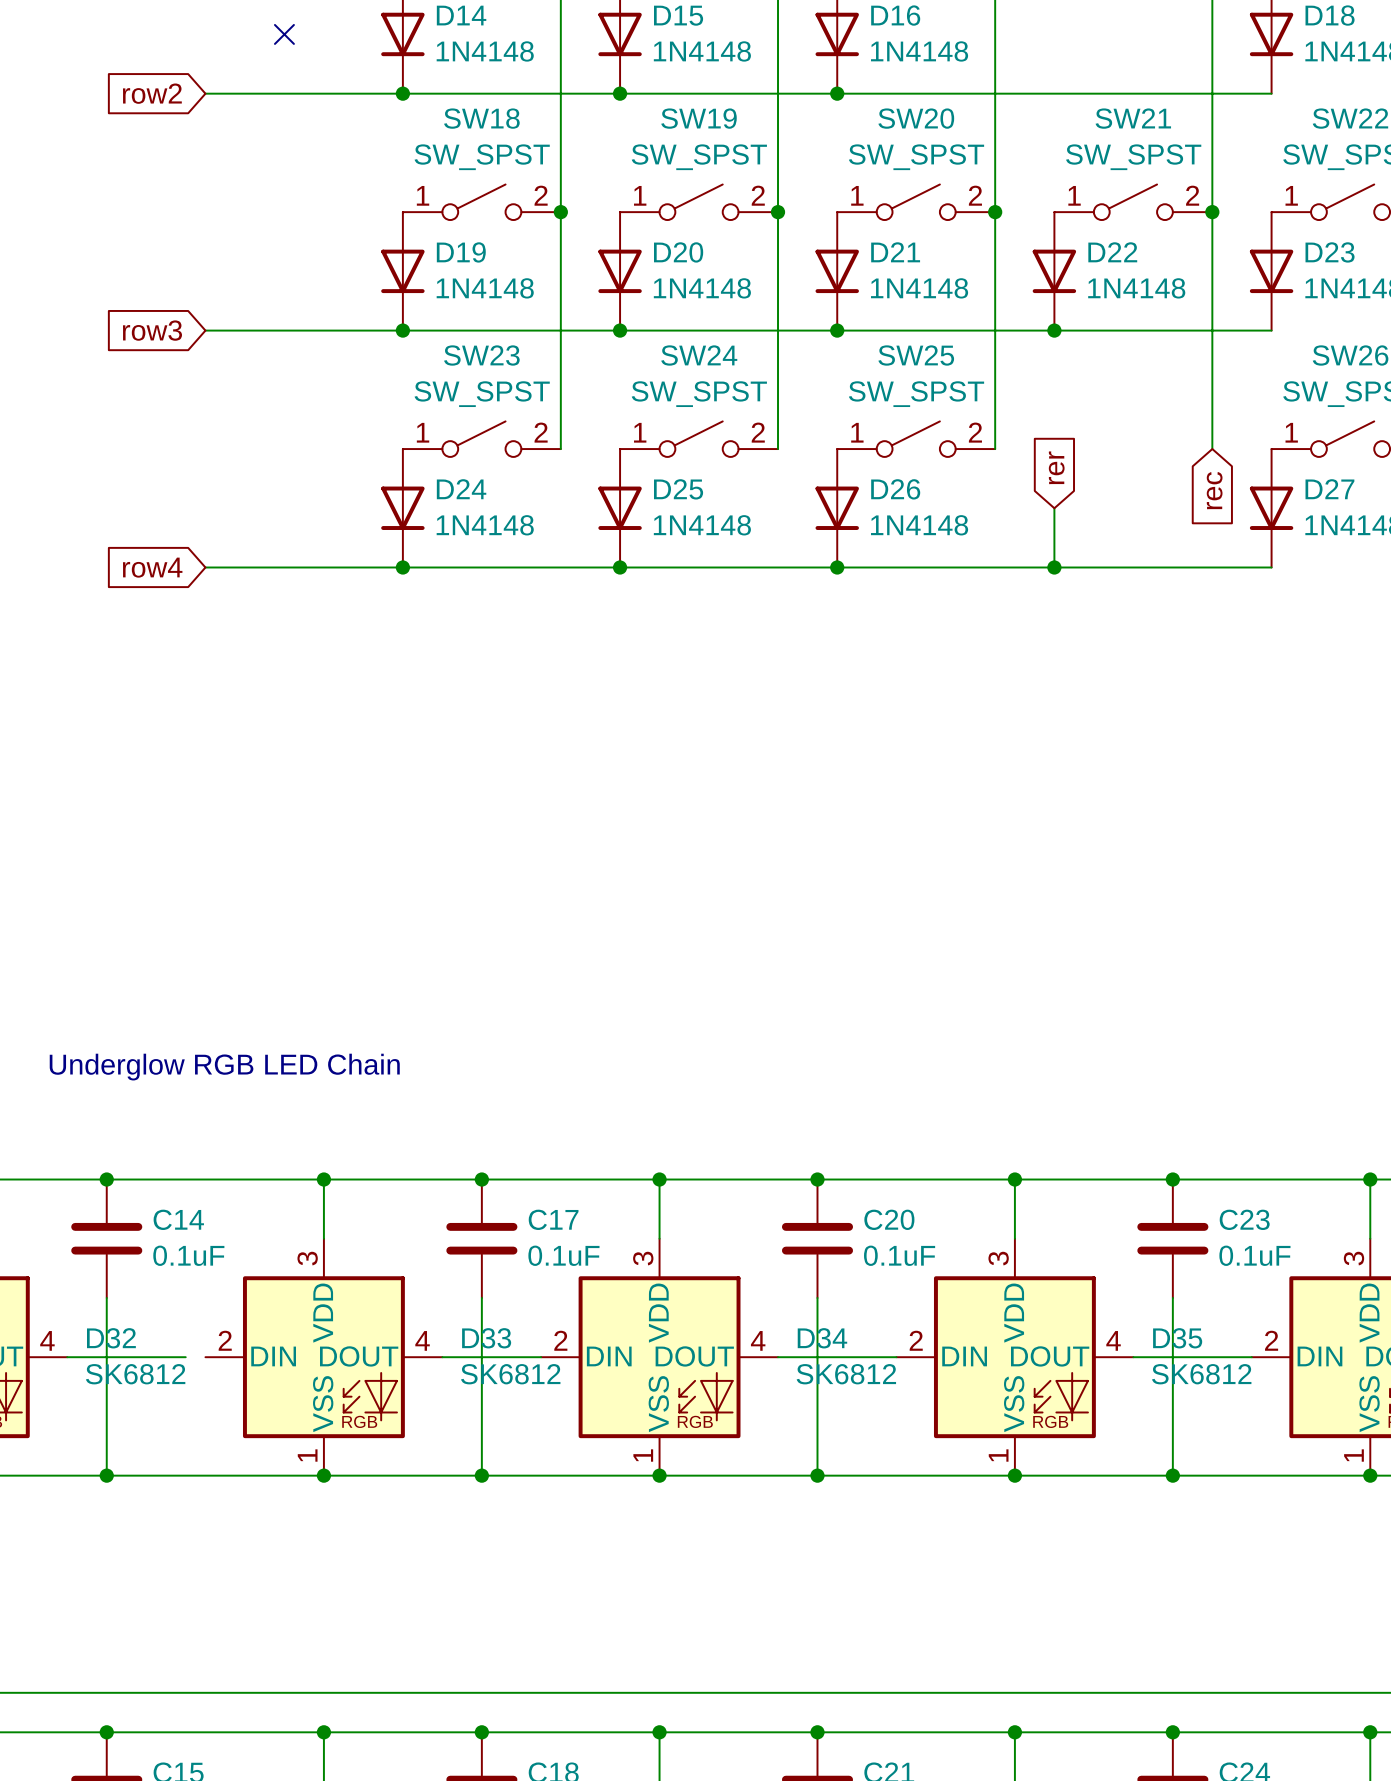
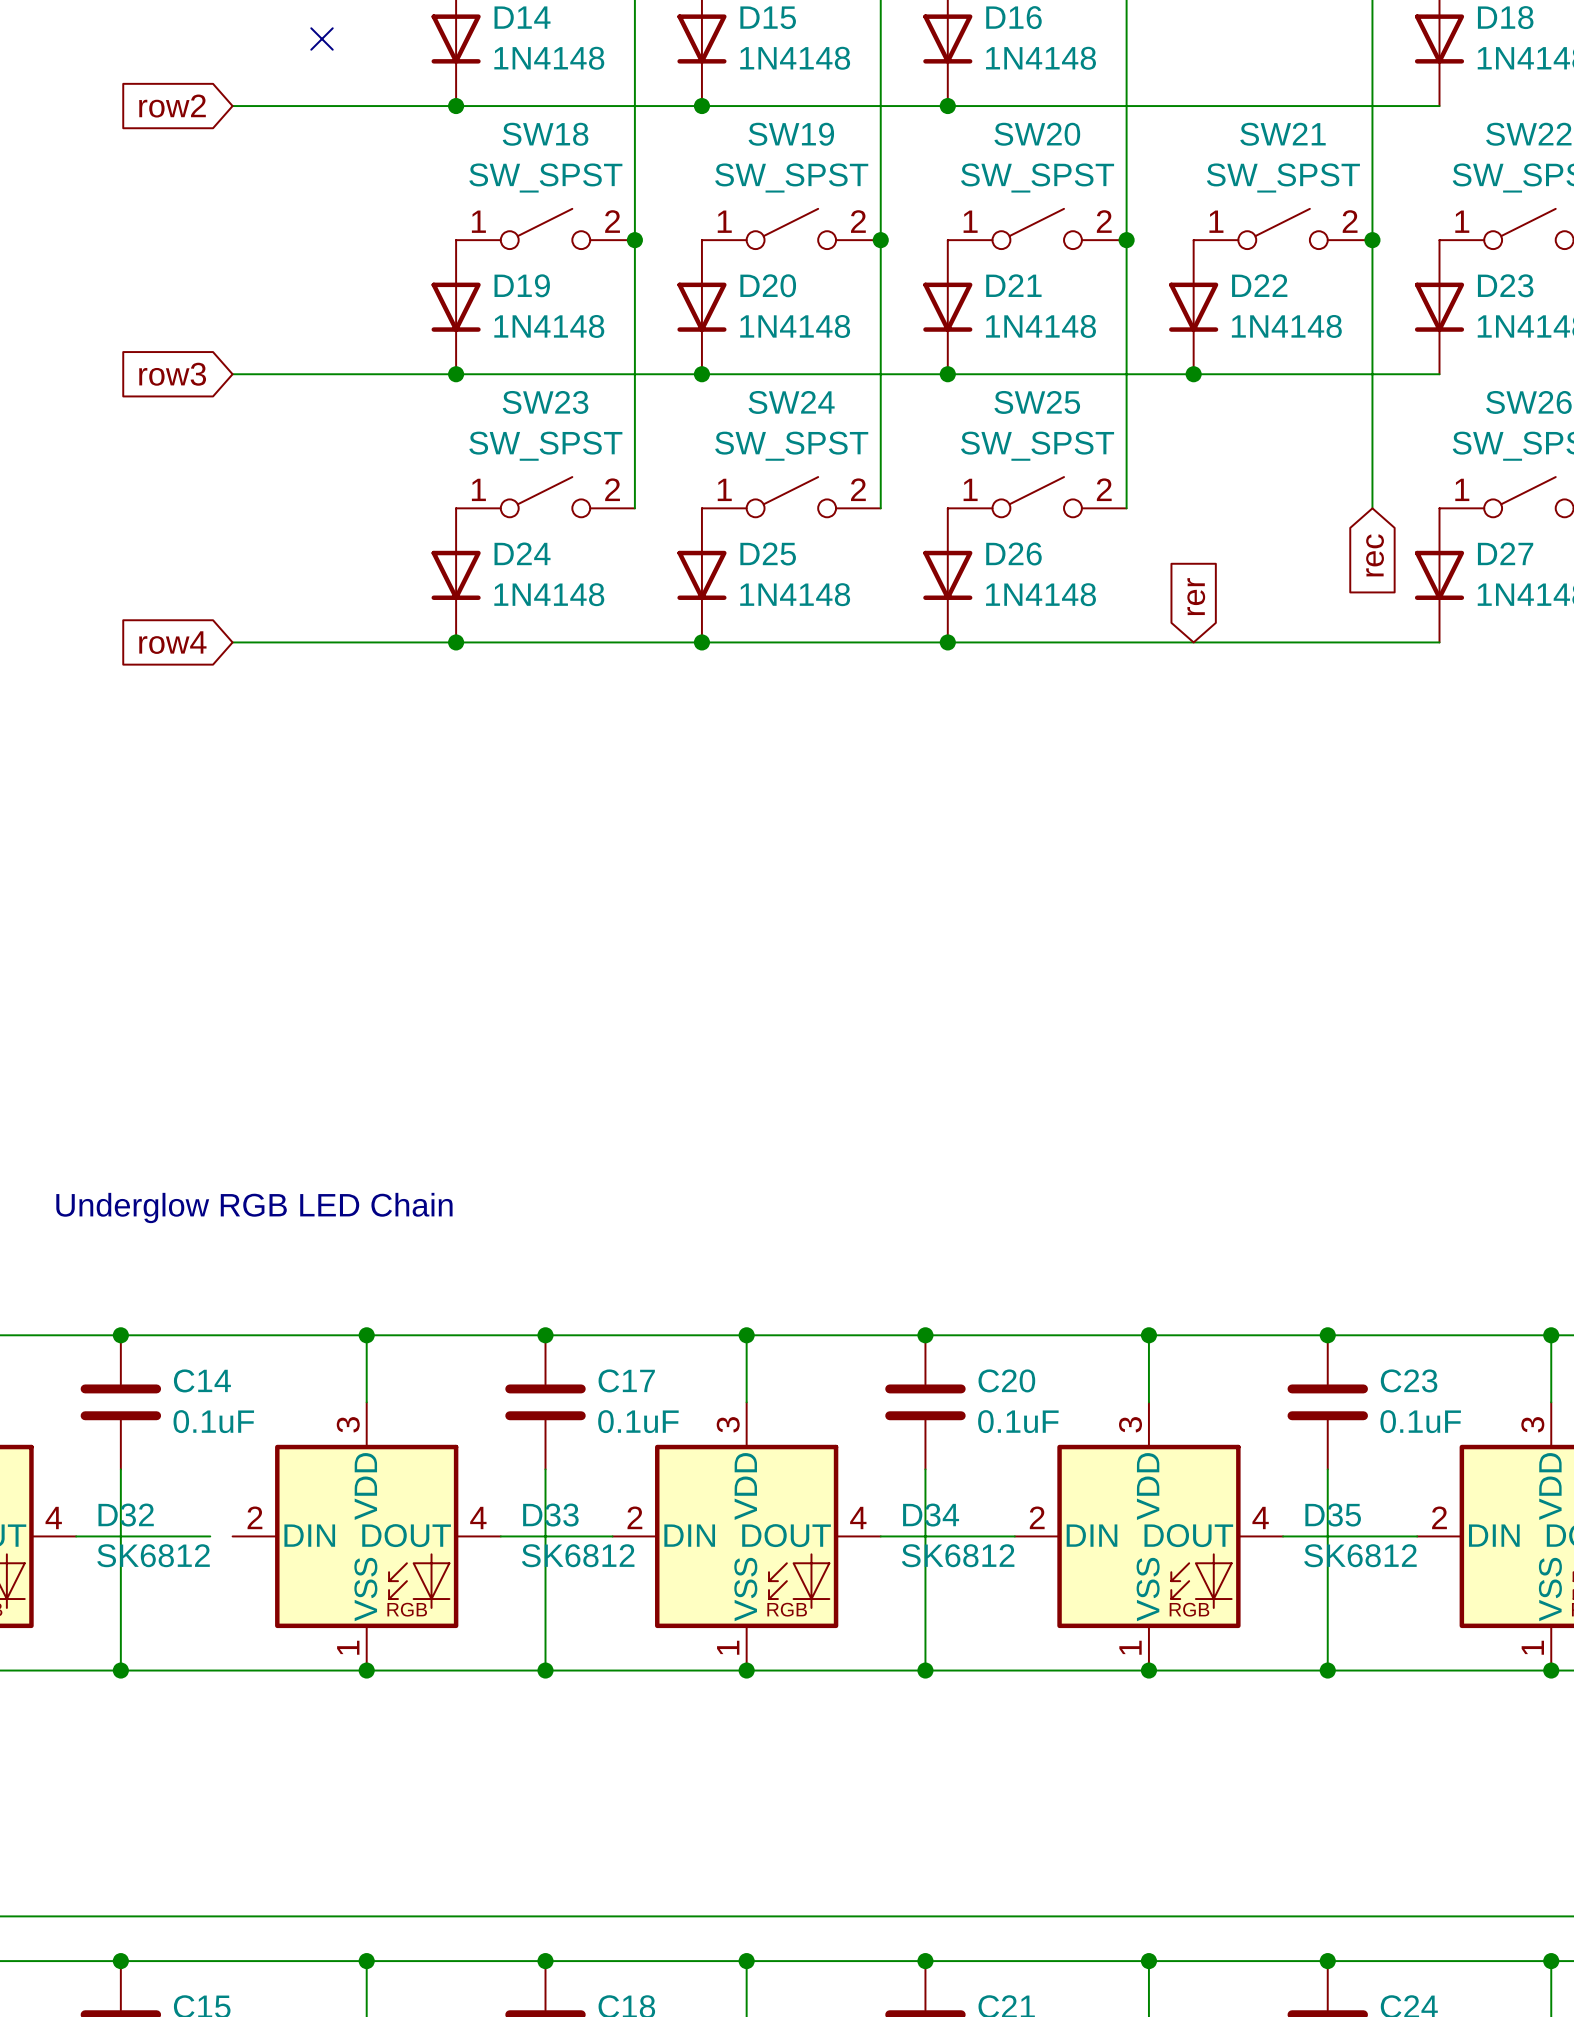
global label position: rer (1056, 467) -> rer (1196, 596)
wire: (1054, 508) (1054, 567) -> none
junction: (1054, 567) -> none

